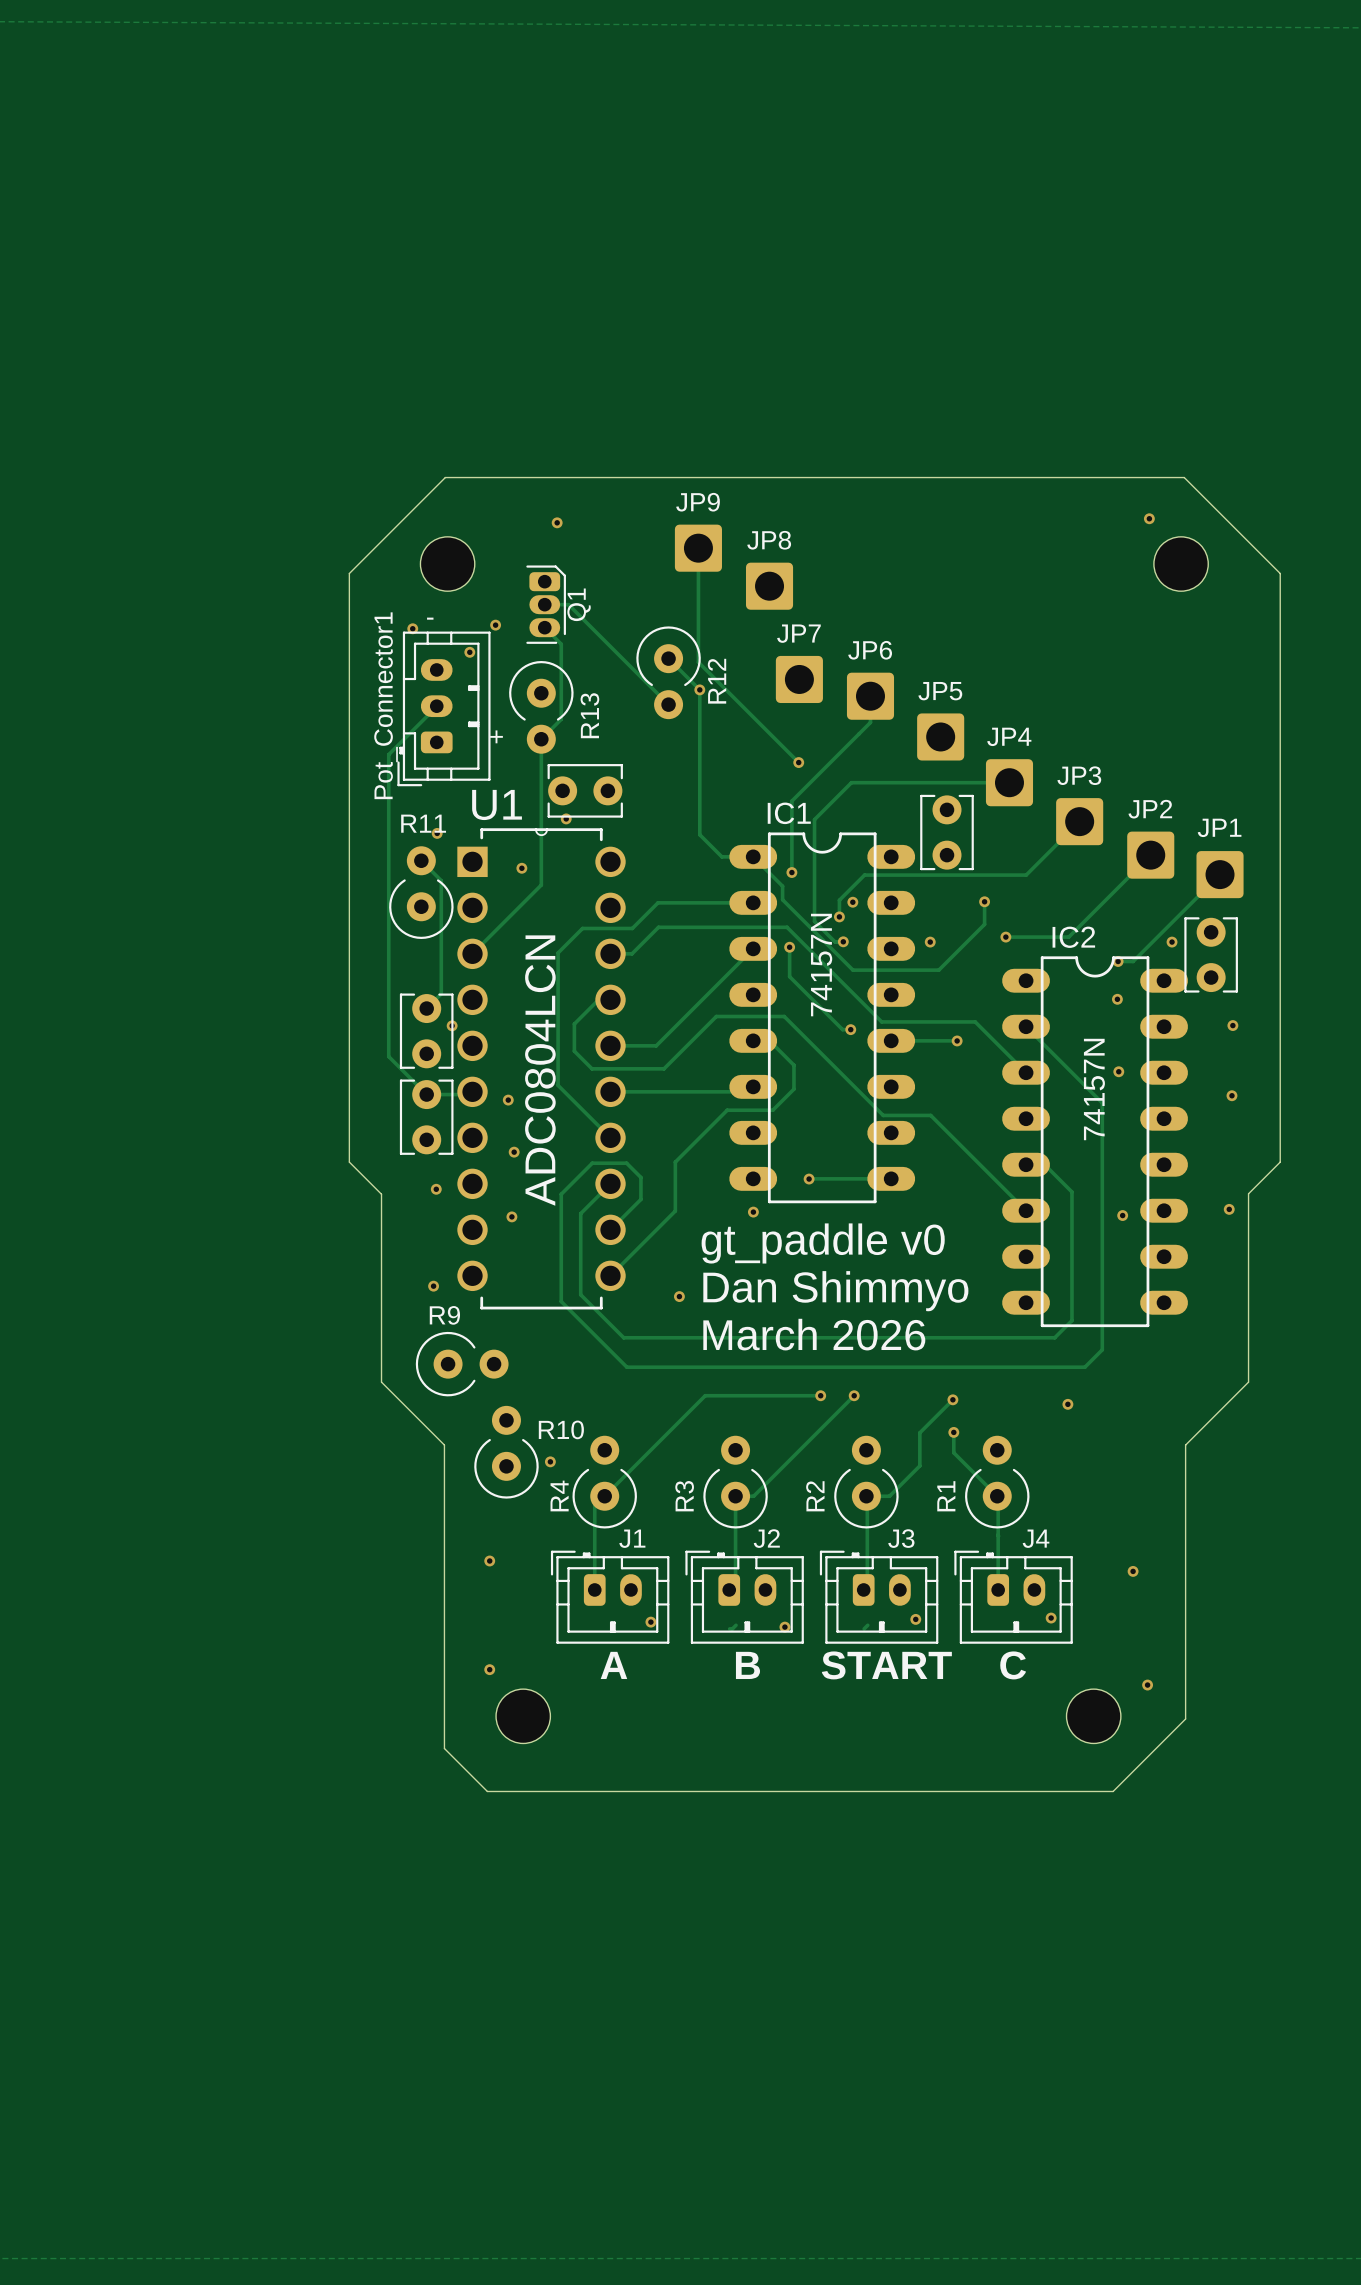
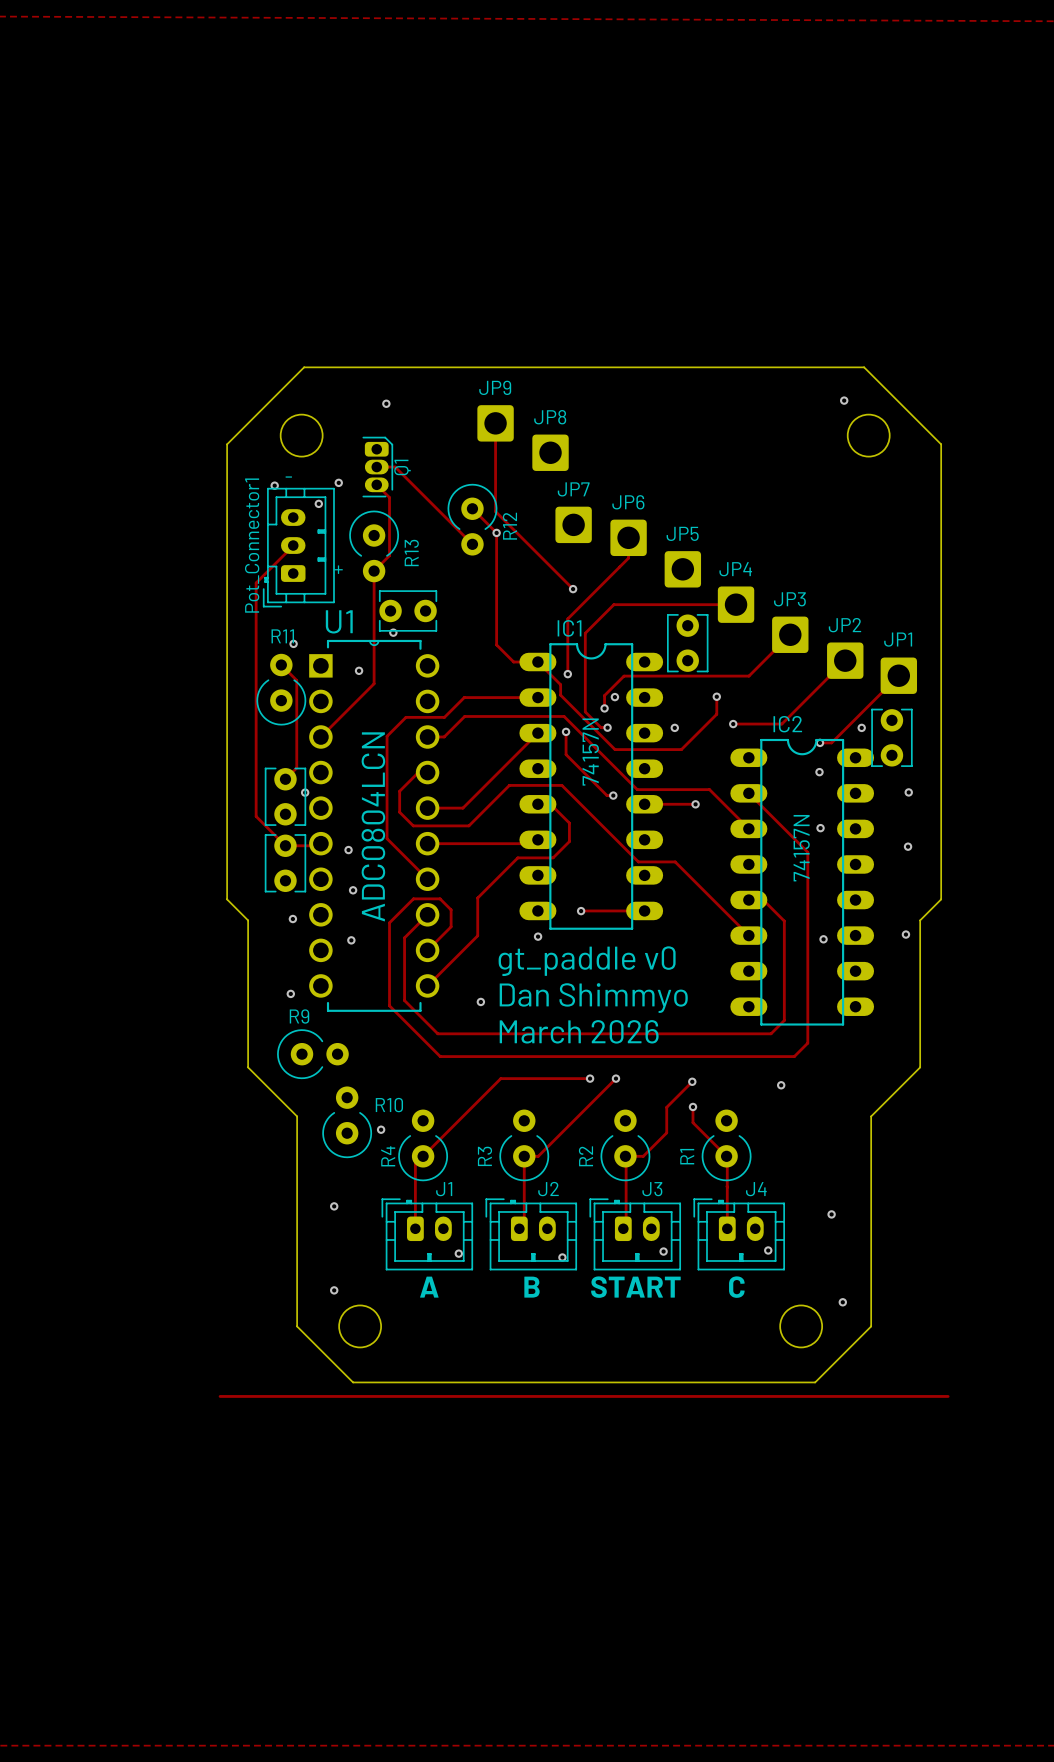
board edge: (351, 1163) (349, 1162) (349, 573) (445, 477) (1184, 477) (1280, 573) (1280, 1162) (1248, 1193) (1248, 1382) (1185, 1445) (1185, 1719) (1113, 1791) (487, 1791) (444, 1748) (444, 1445) (381, 1382) (381, 1194) (378, 1191) -> (227, 899) (227, 444) (304, 367) (864, 367) (941, 444) (941, 899) (920, 920) (920, 1067) (871, 1116) (871, 1326) (815, 1382) (353, 1382) (297, 1326) (297, 1116) (248, 1067) (248, 920)
track: (736, 1625) (729, 1628) -> none
track: (867, 1625) (864, 1628) -> none
track: none -> (220, 1396) (948, 1396)

